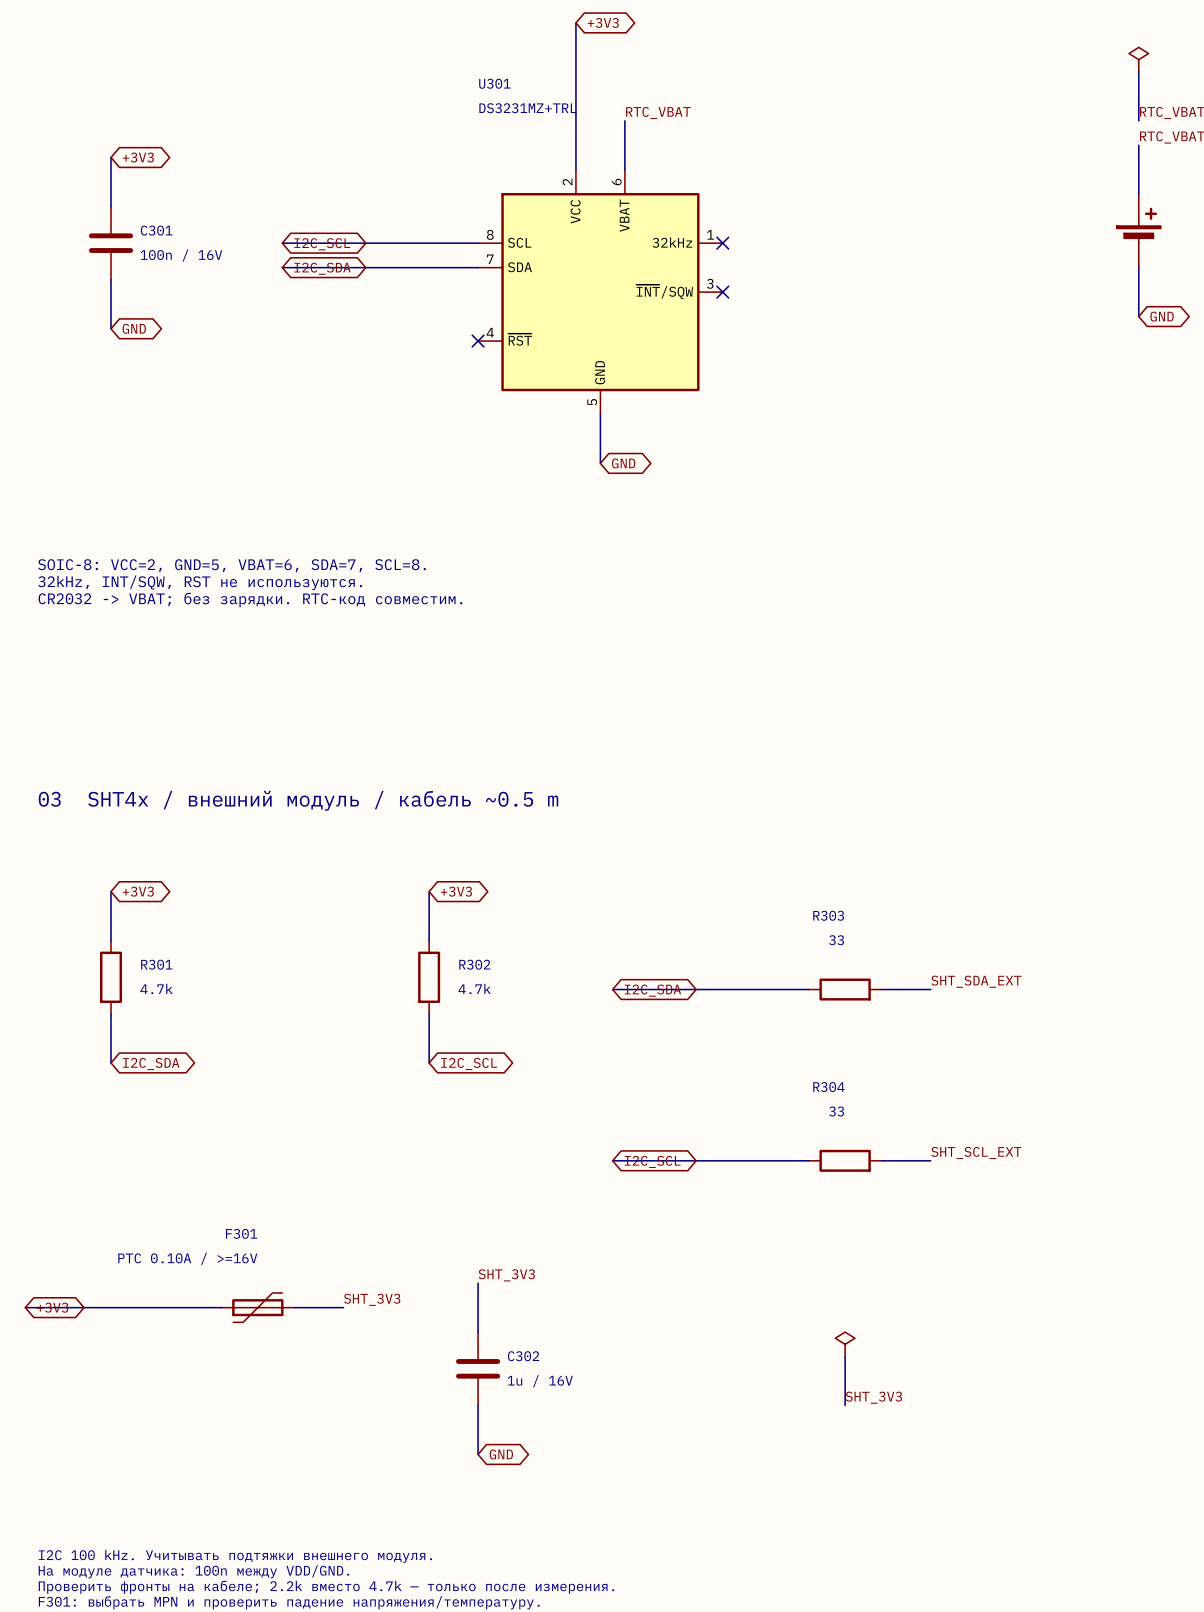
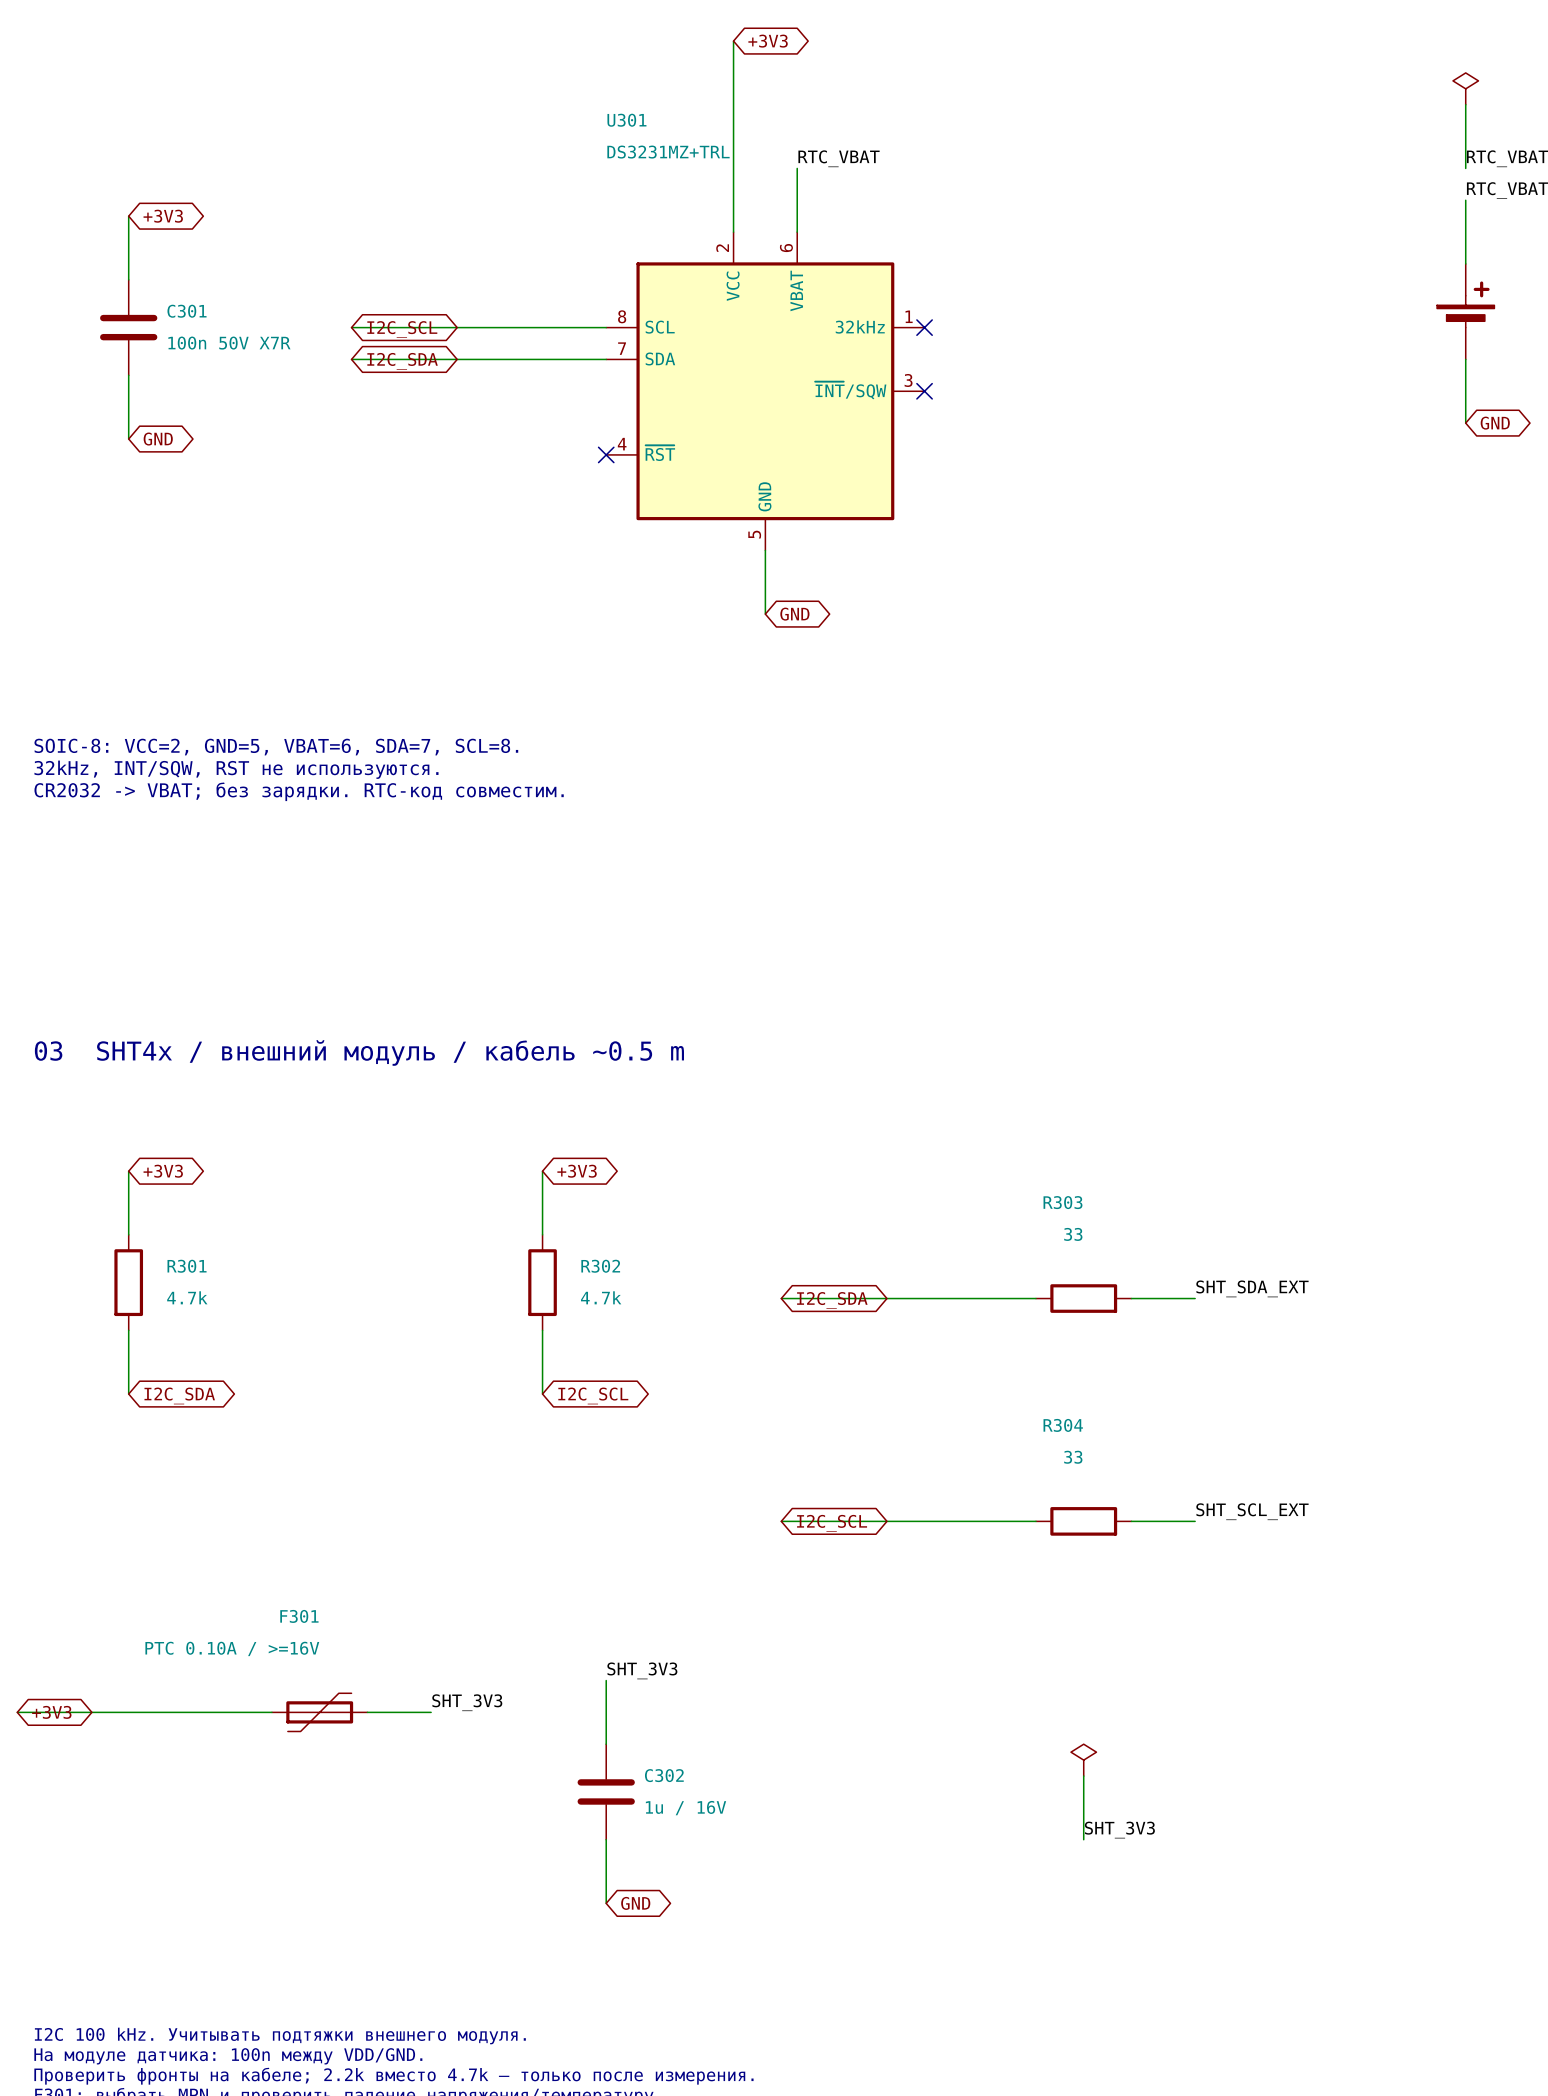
C301 value: 100n / 16V (181, 255) -> 100n 50V X7R (229, 343)

